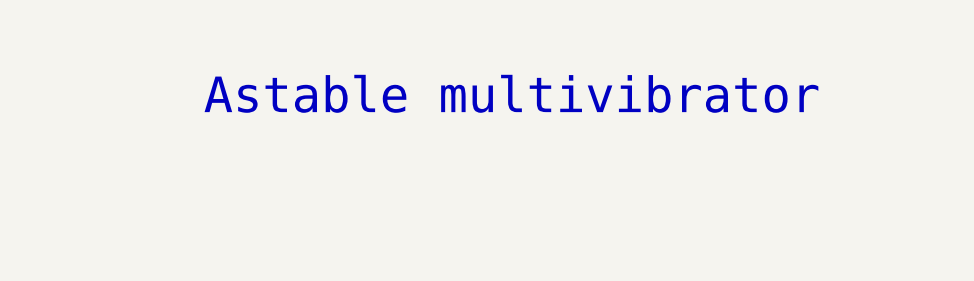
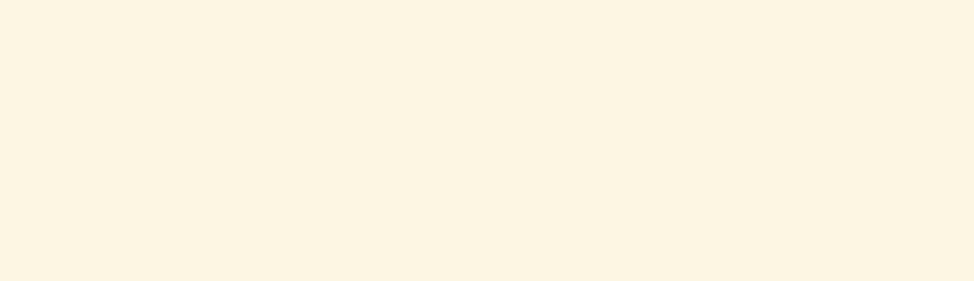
text: Astable multivibrator (511, 93) -> none

